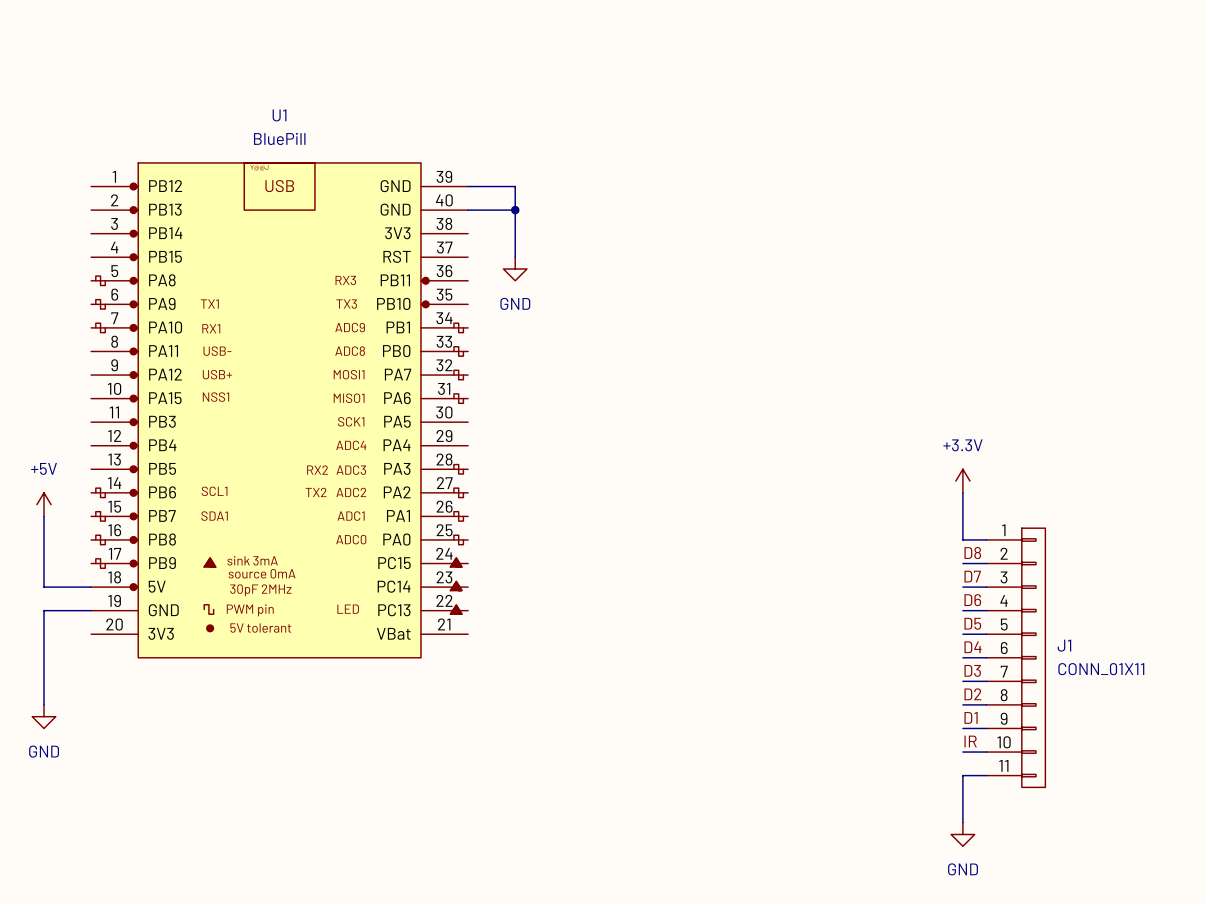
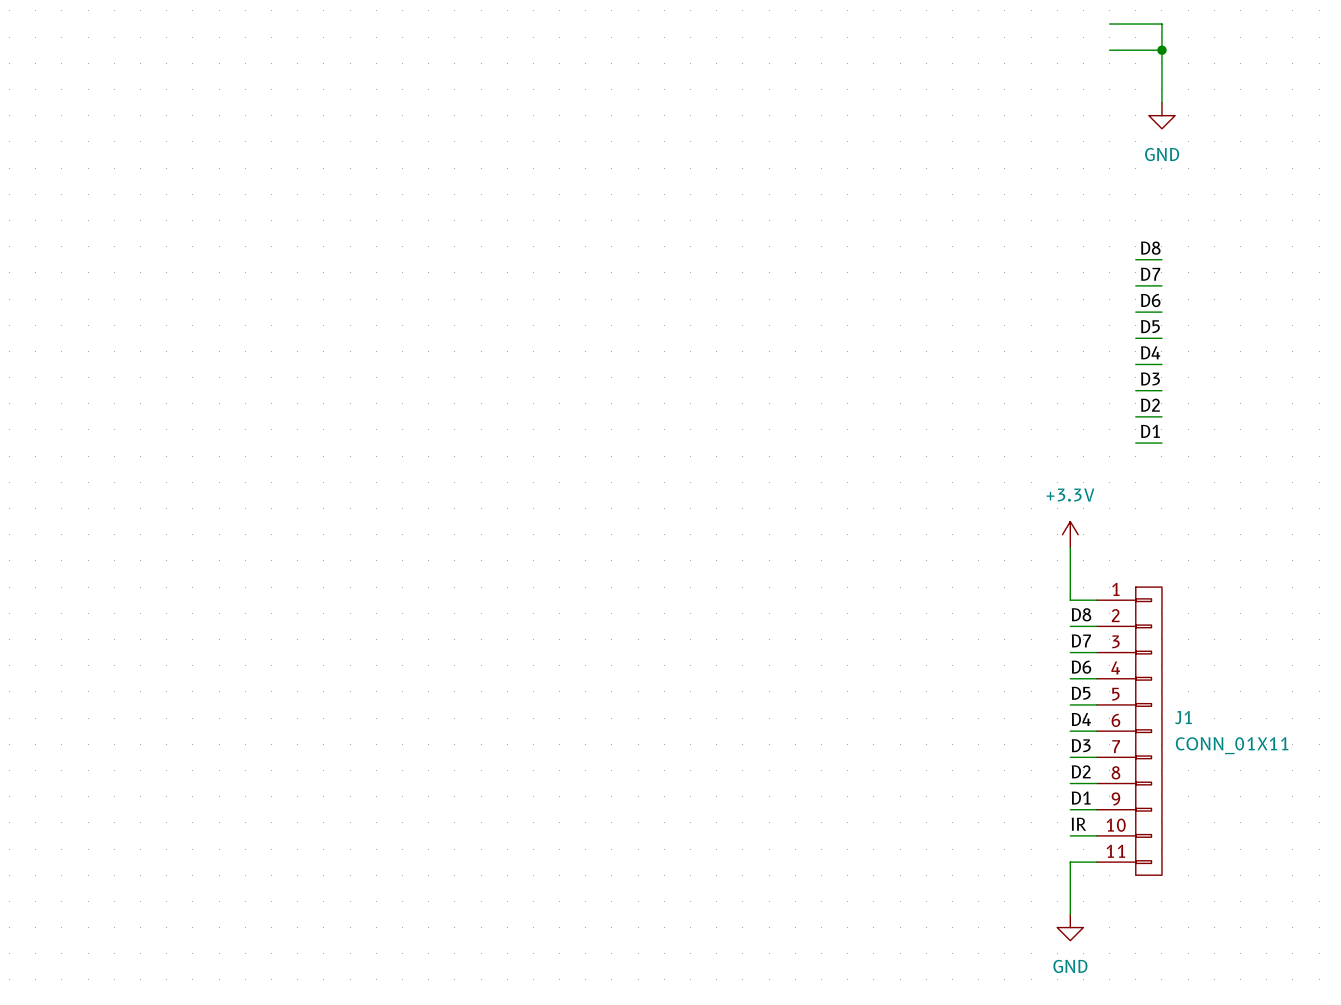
wire: none -> (1109, 24) (1161, 24) (1161, 102)
wire: none -> (1109, 50) (1161, 50)
junction: none -> (1161, 50)
power symbol: none -> GND (1161, 115)
wire: (468, 186) (515, 186) (515, 257) -> none
wire: (468, 210) (515, 210) -> none
junction: (515, 210) -> none
label: none -> D8 (1150, 248)
wire: none -> (1135, 259) (1161, 259)
label: none -> D7 (1150, 274)
wire: none -> (1135, 285) (1161, 285)
power symbol: GND (515, 269) -> none
label: none -> D6 (1150, 300)
wire: none -> (1135, 312) (1161, 312)
label: none -> D5 (1150, 326)
wire: none -> (1135, 338) (1161, 338)
label: none -> D4 (1150, 352)
wire: none -> (1135, 364) (1161, 364)
label: none -> D3 (1150, 379)
wire: none -> (1135, 390) (1161, 390)
label: none -> D2 (1150, 405)
wire: none -> (1135, 416) (1161, 416)
label: none -> D1 (1150, 431)
wire: none -> (1135, 443) (1161, 443)
U1: BluePill (279, 410) -> none
power symbol: +5V (43, 504) -> none
wire: (43, 516) (43, 587) (91, 587) -> none
wire: (91, 610) (43, 610) (43, 704) -> none
power symbol: GND (43, 716) -> none

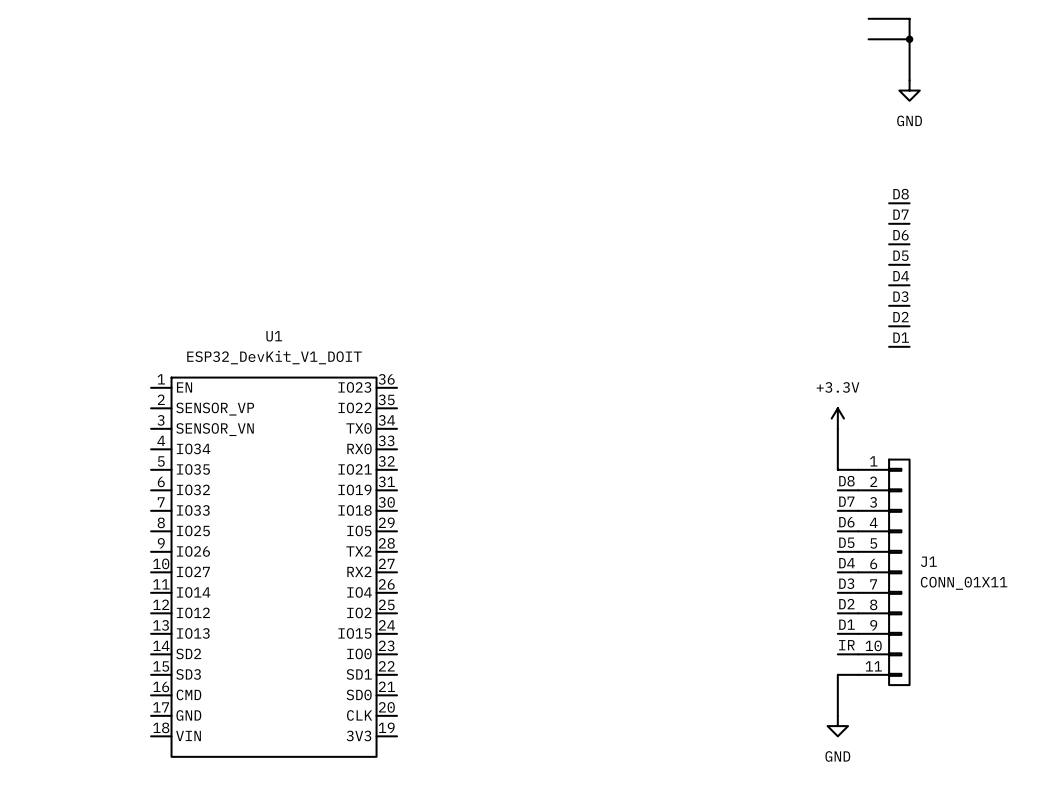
U1: none -> ESP32_DevKit_V1_DOIT (274, 567)

